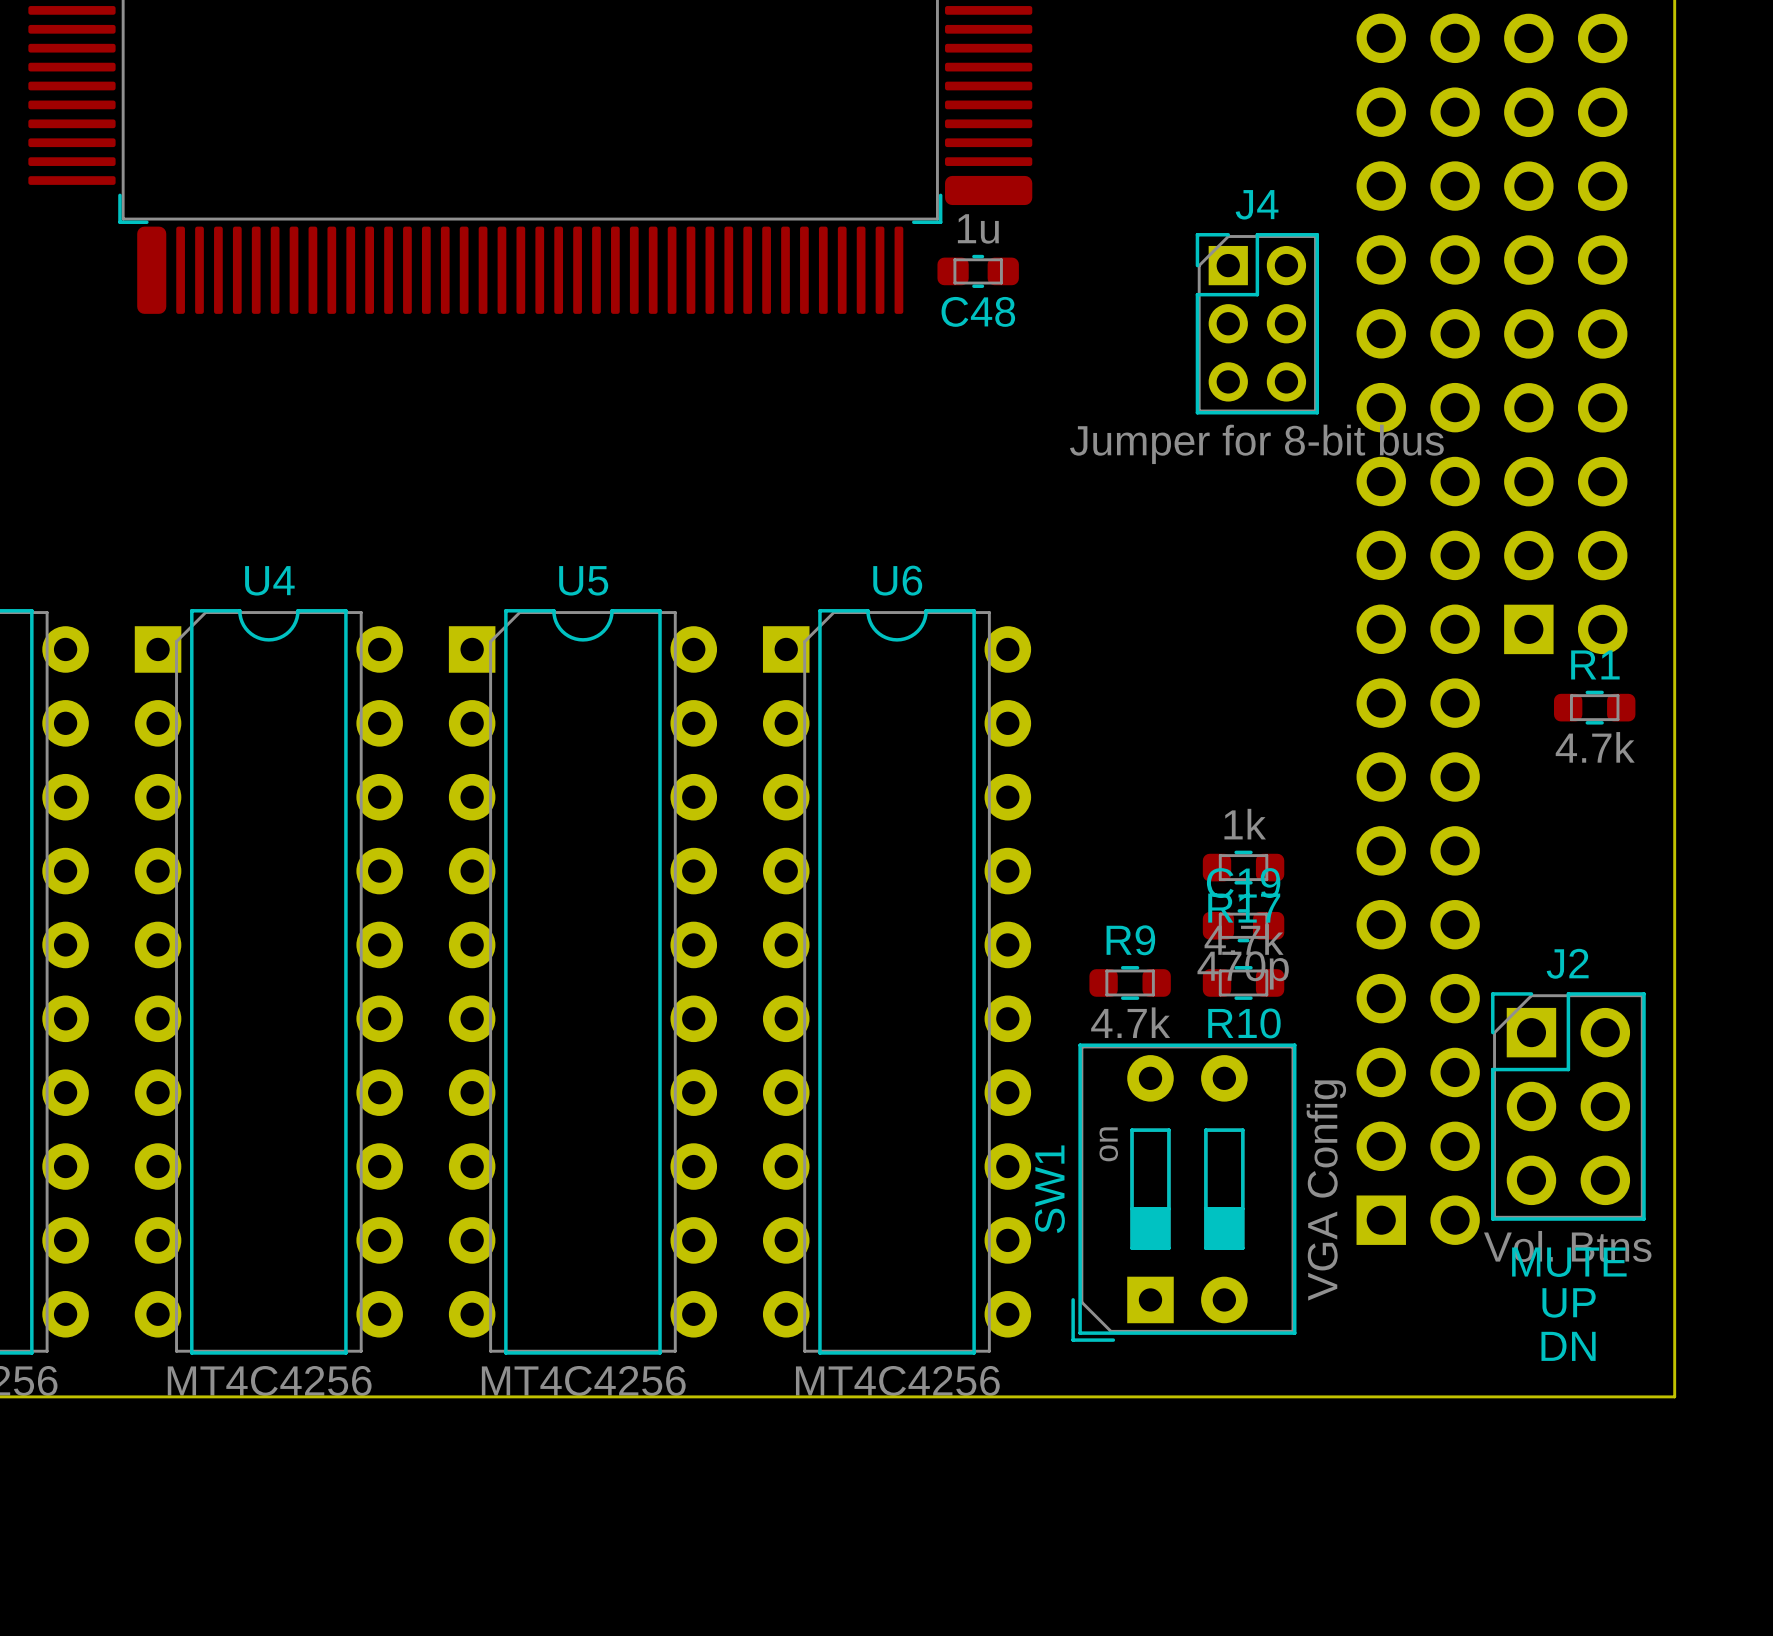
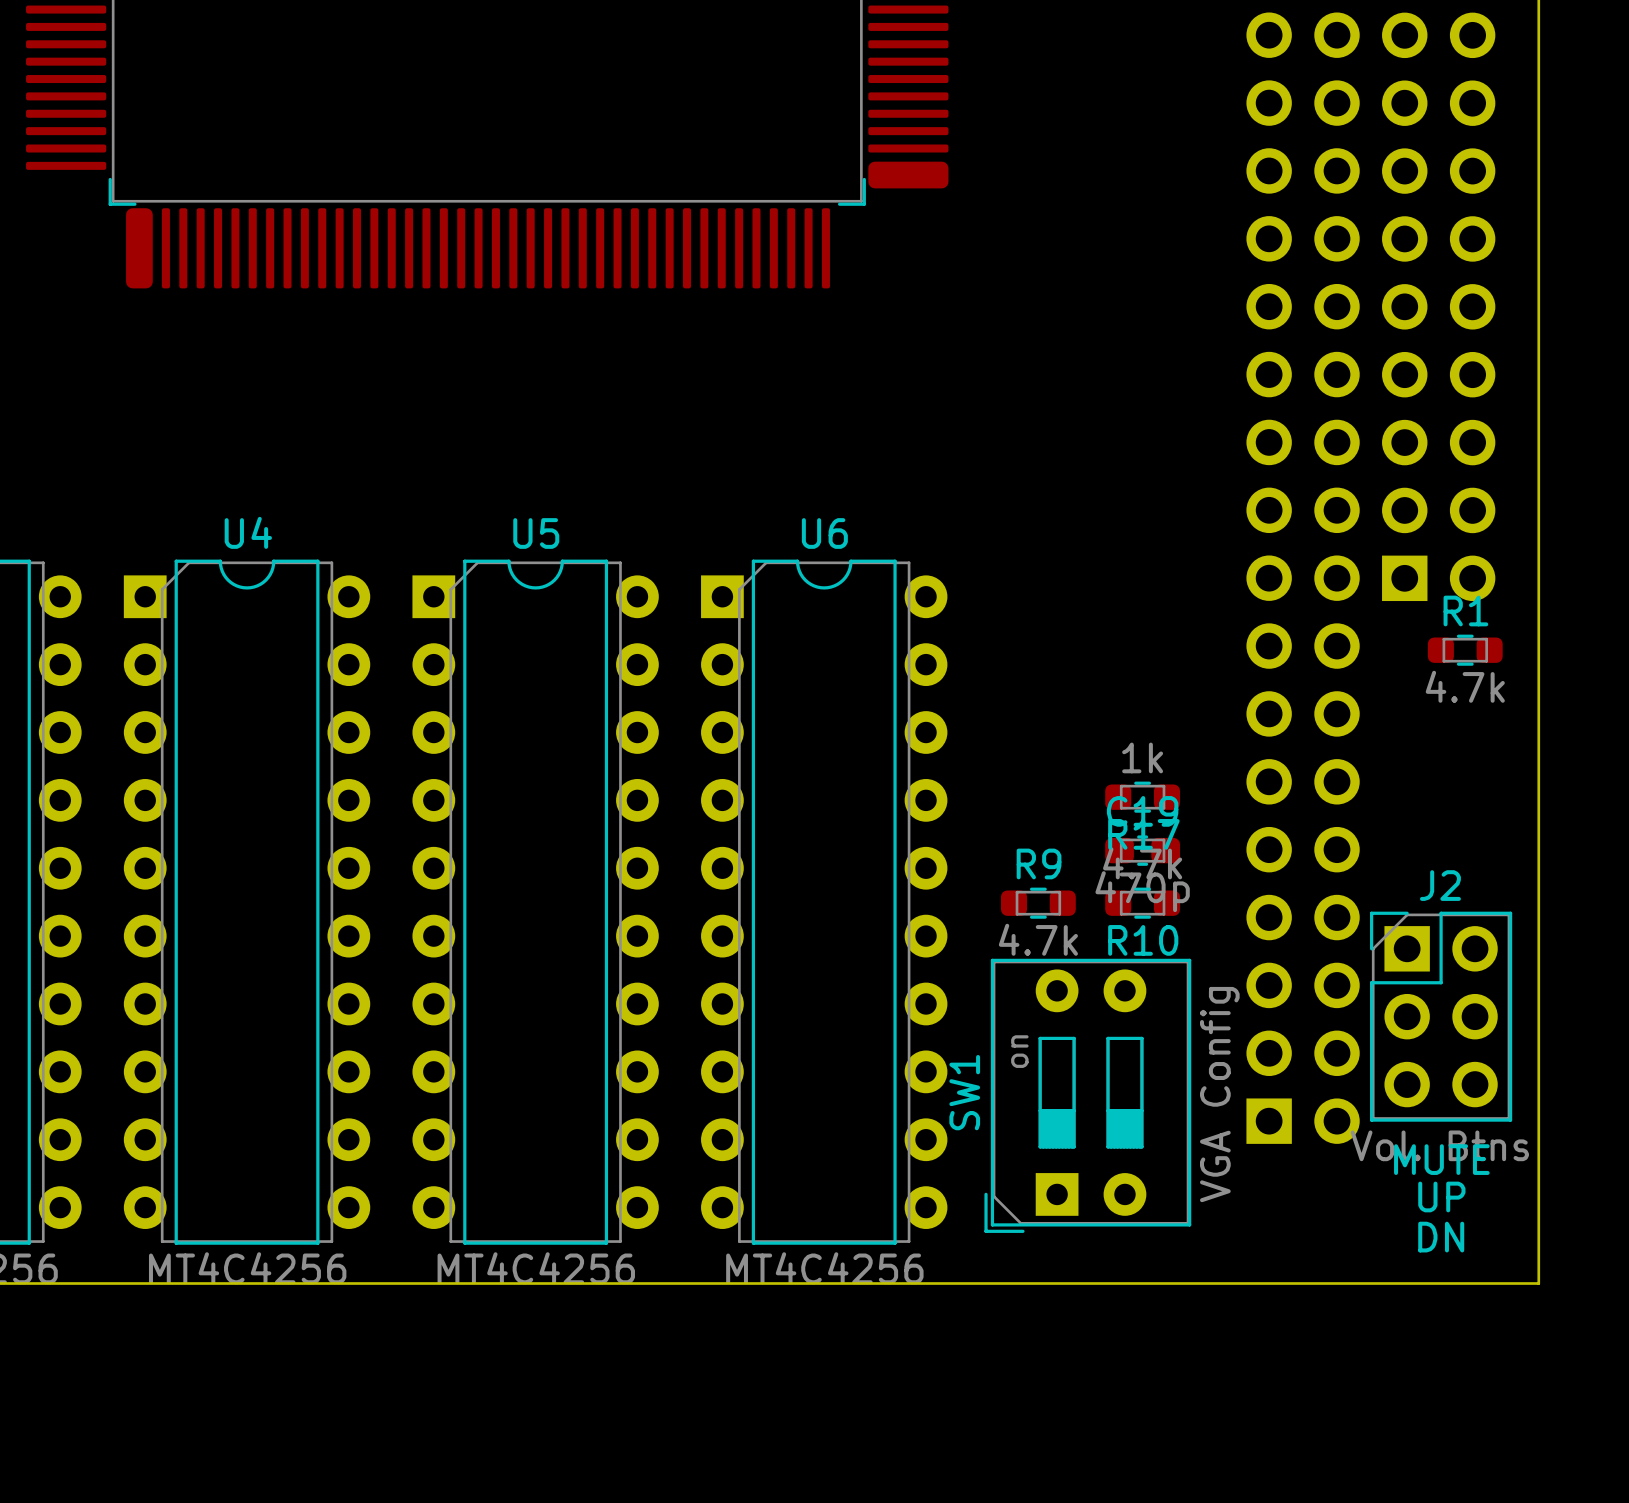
C48: 1u (978, 271) -> none
J4: Jumper for 8-bit bus (1257, 323) -> none

